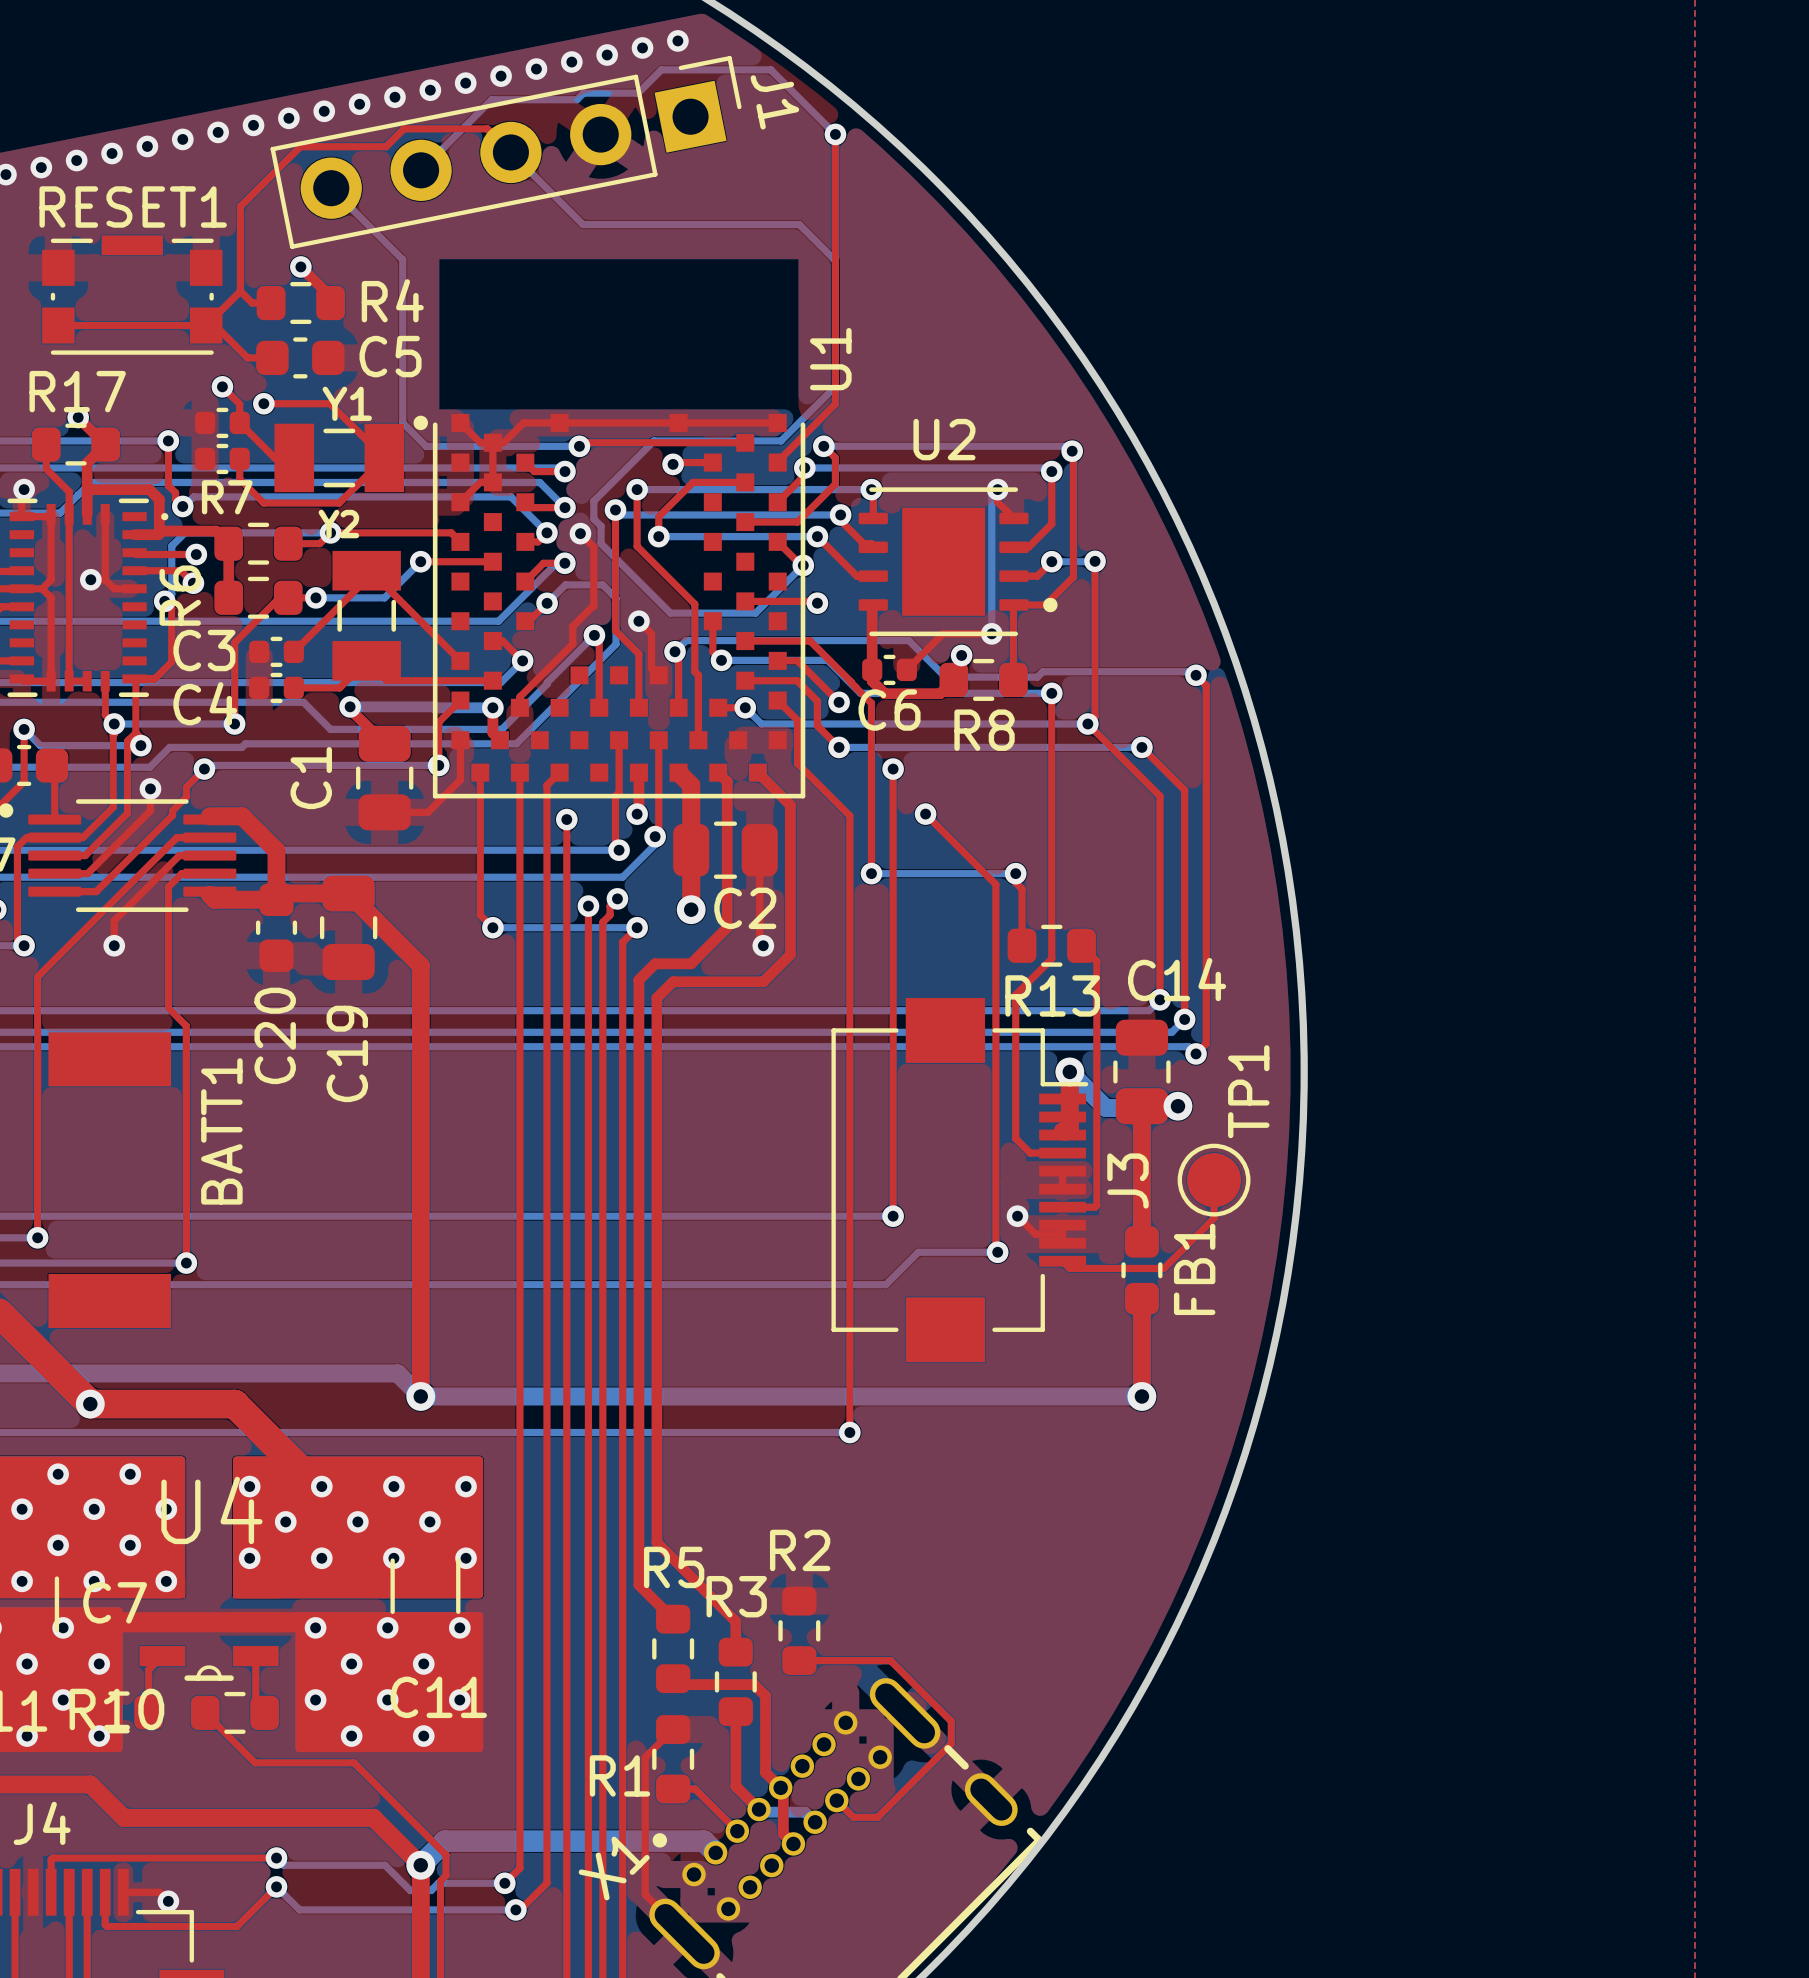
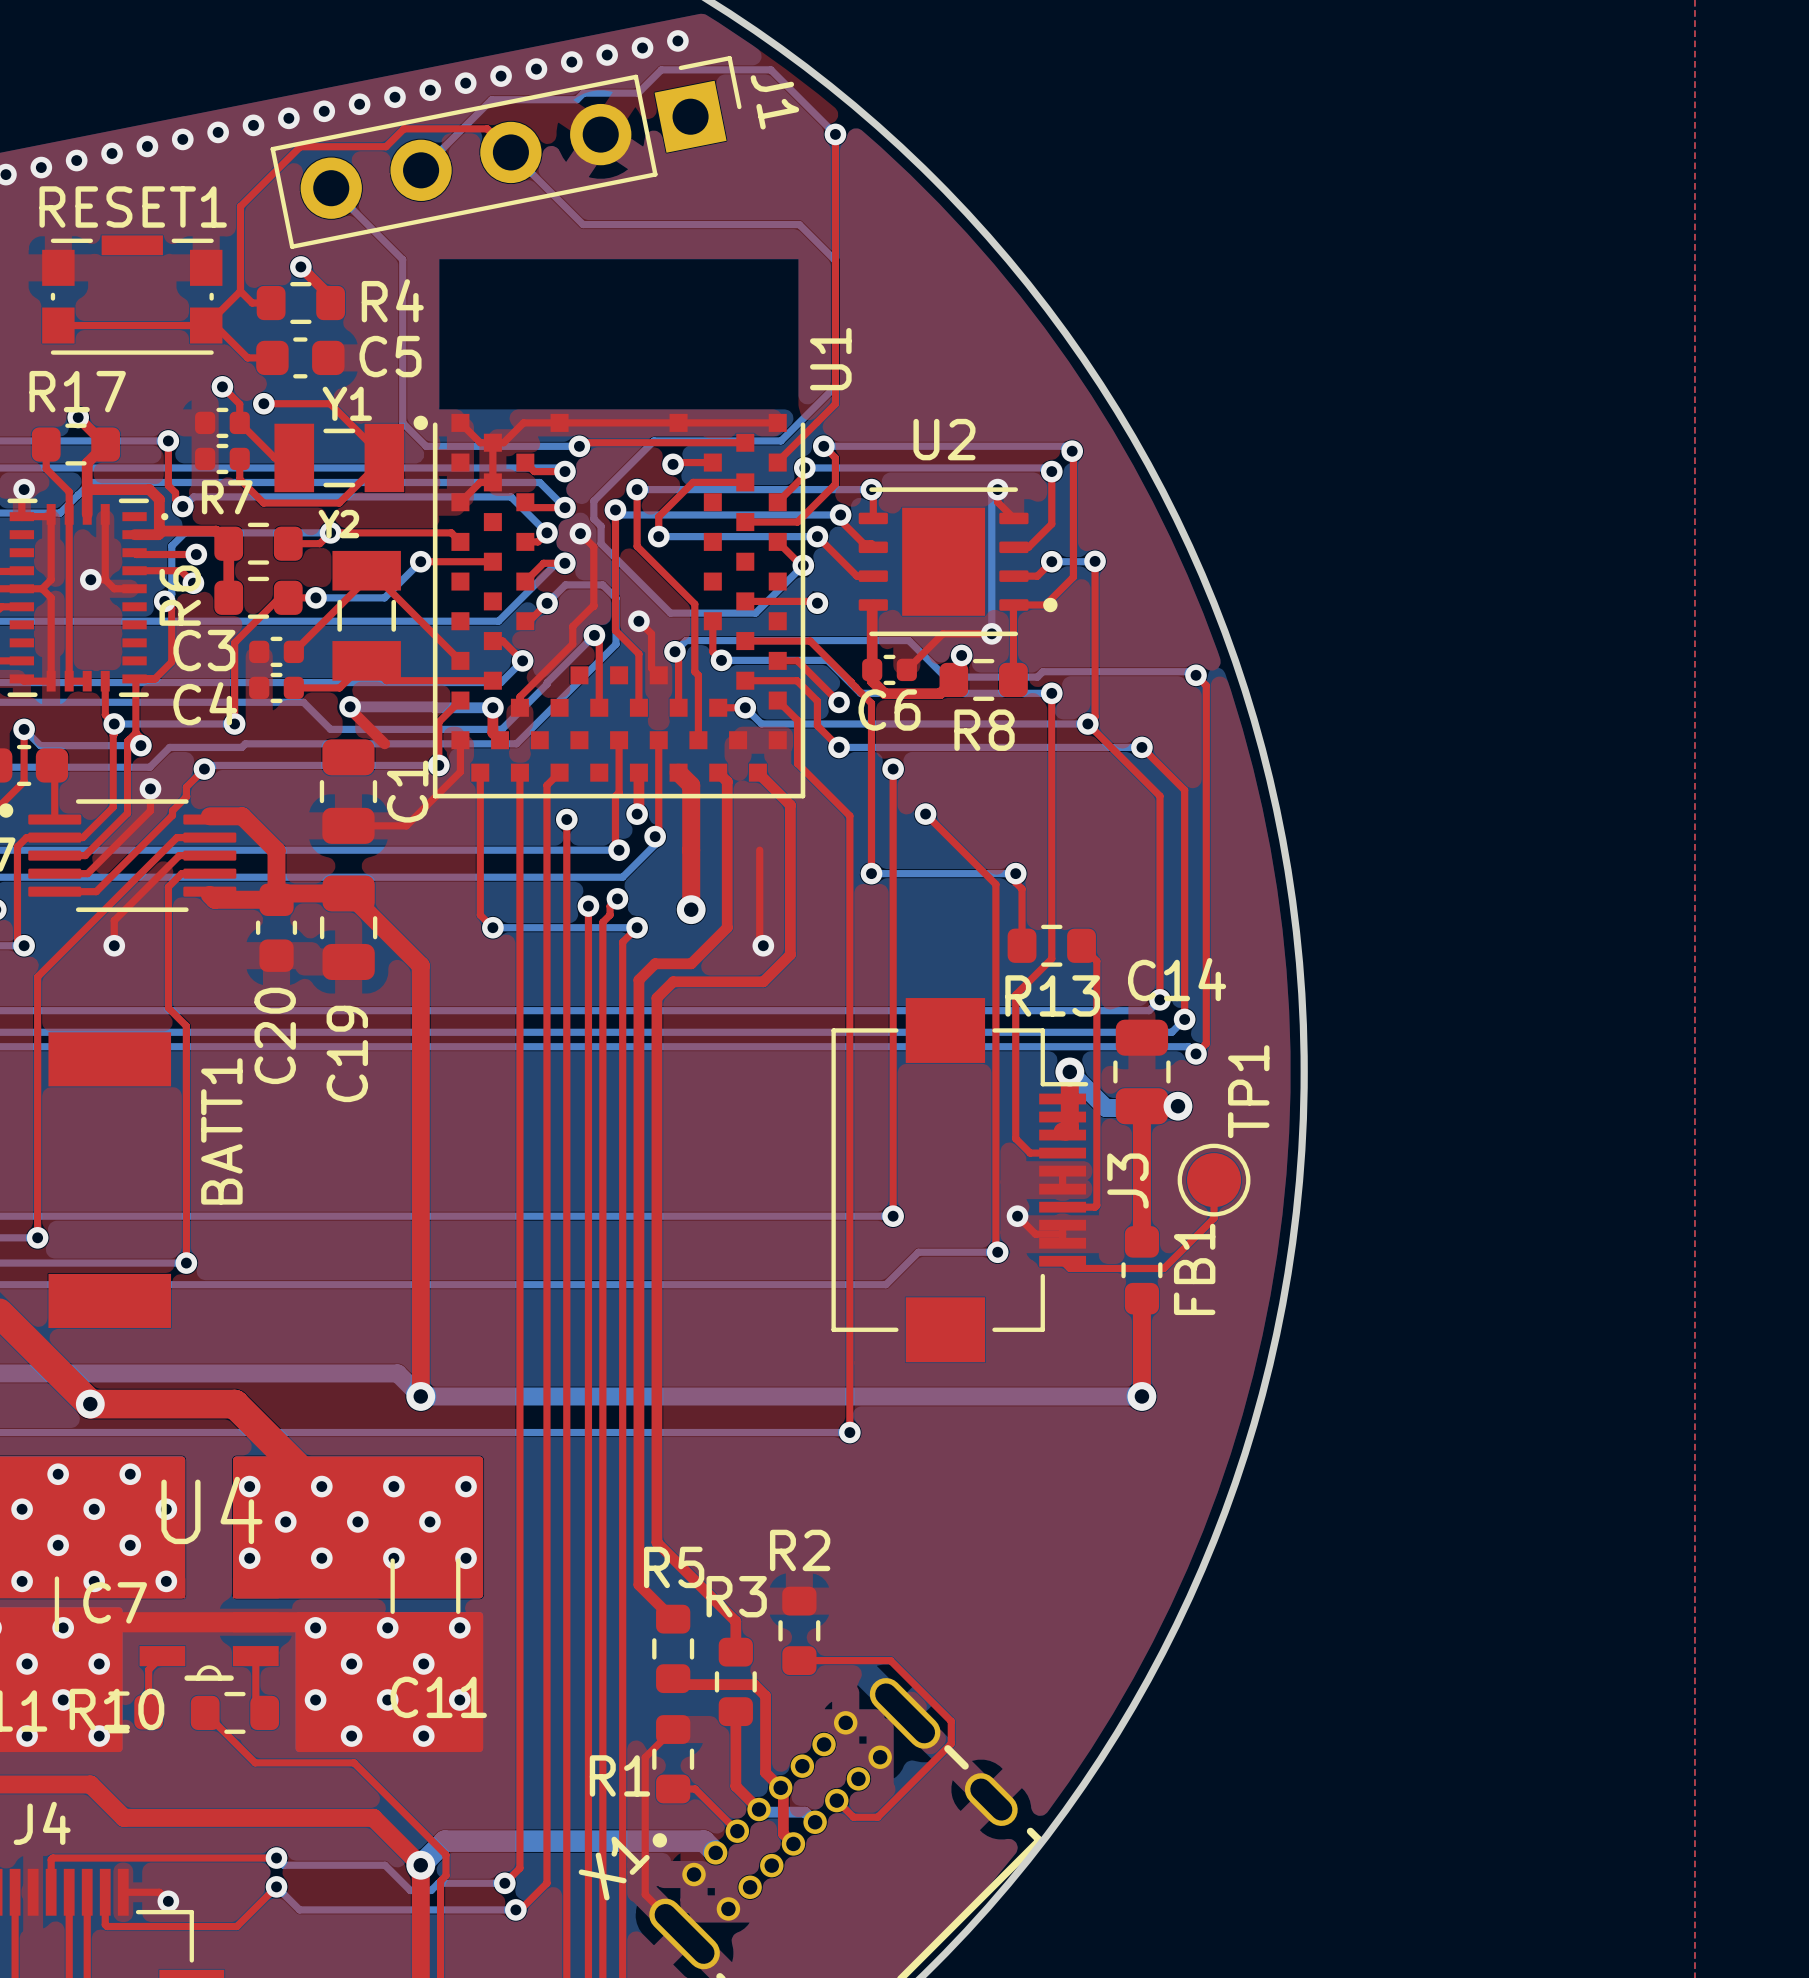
top track: (460, 771) (460, 779) (427, 812) (384, 812) -> (460, 771) (406, 825) (348, 825)
C1 name position: C1 (311, 778) -> C1 (407, 791)
C1 position: (384, 778) -> (348, 791)
C2: (725, 850) -> none

